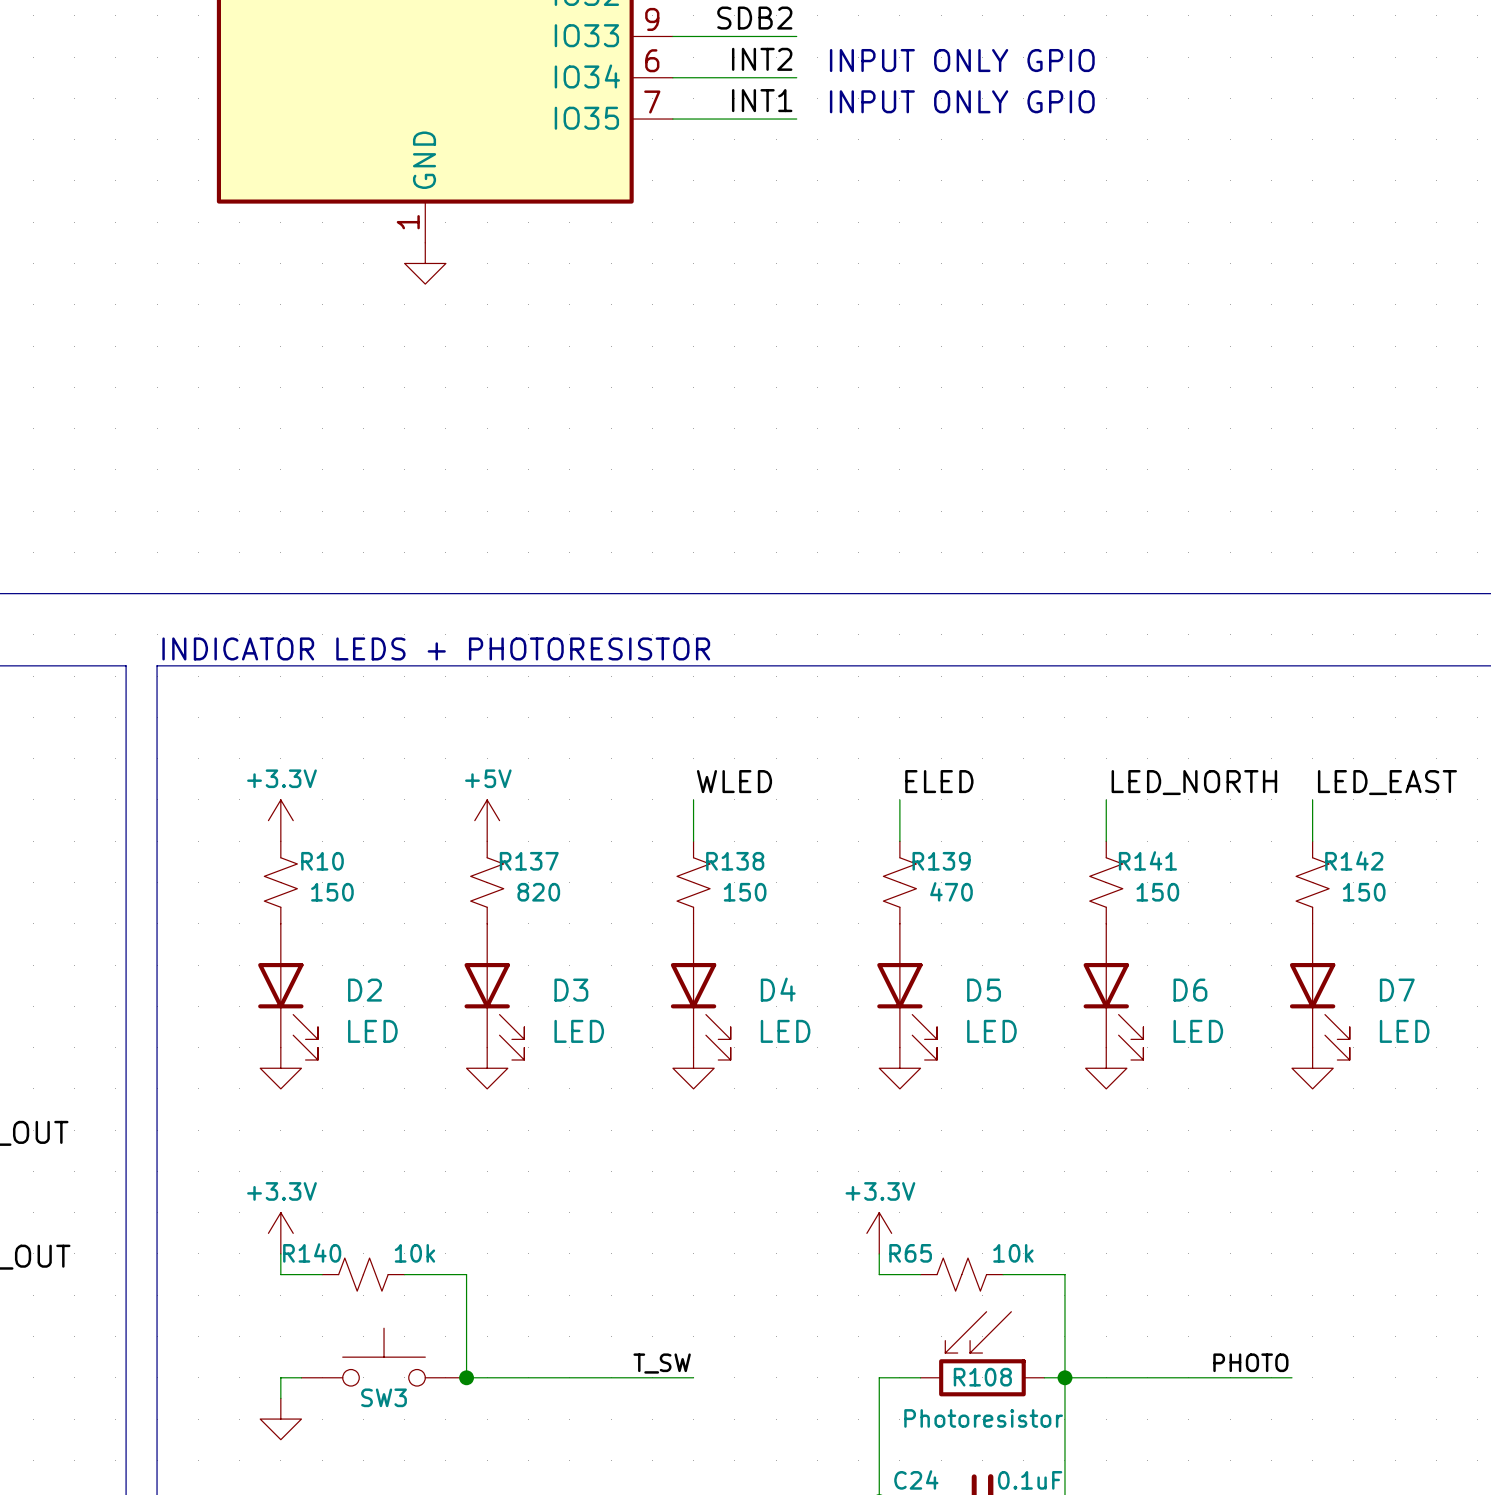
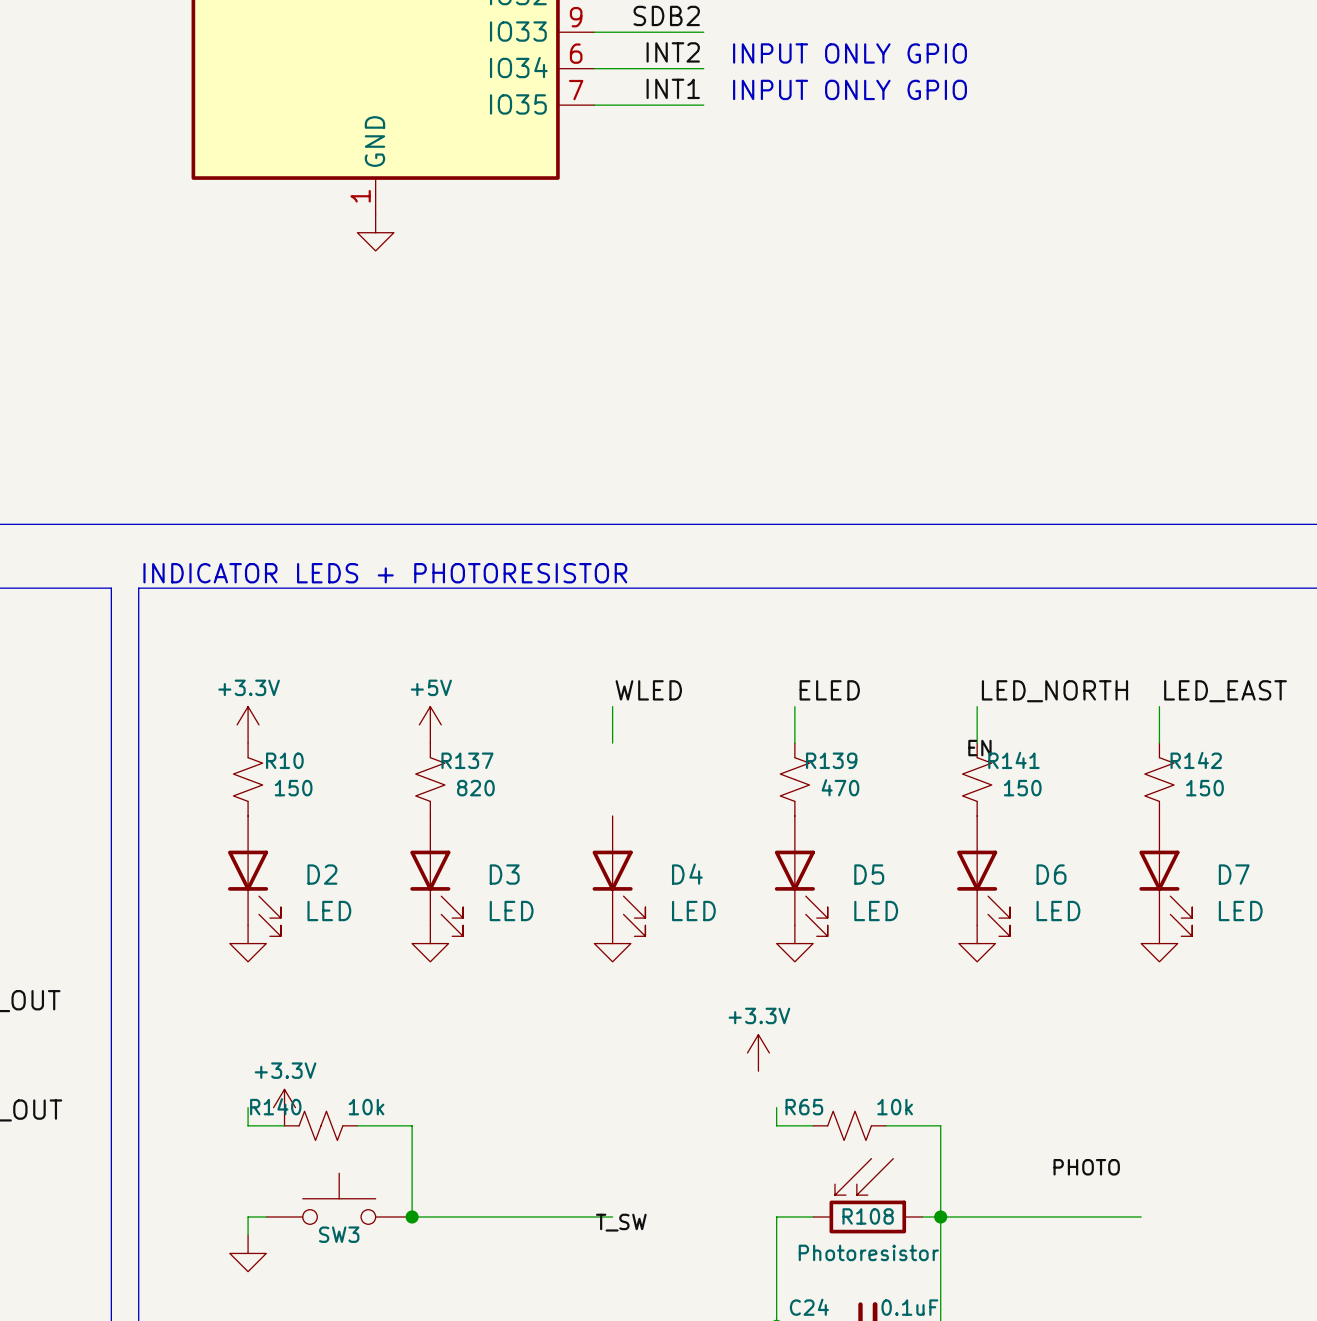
label: none -> EN (979, 748)
R138: 150 (693, 882) -> none
power symbol position: +3.3V (280, 1233) -> +3.3V (284, 1107)
power symbol position: +3.3V (879, 1233) -> +3.3V (758, 1052)
label position: PHOTO (1250, 1362) -> PHOTO (1086, 1167)
label position: T_SW (662, 1363) -> T_SW (621, 1222)

